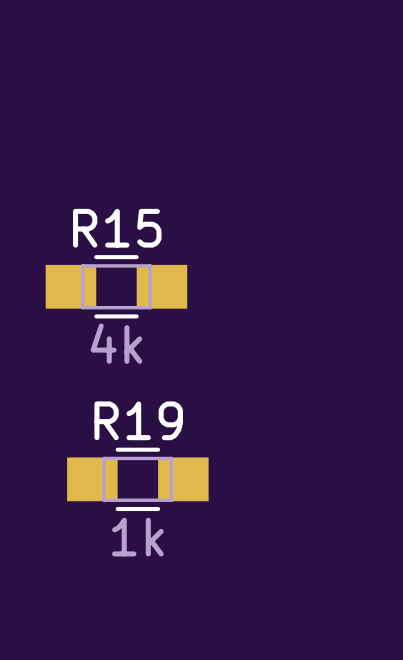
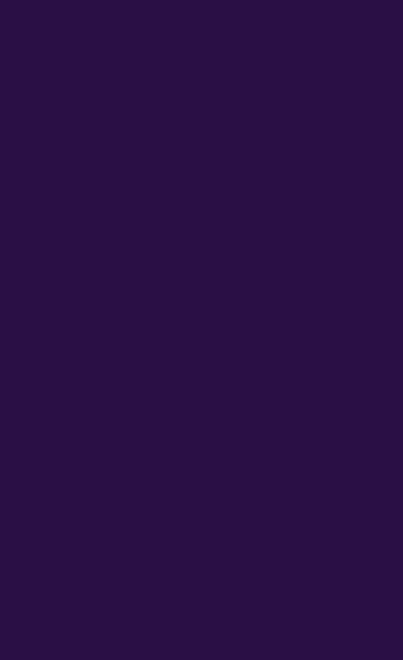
R15: 4k (116, 286) -> none
R19: 1k (137, 479) -> none

